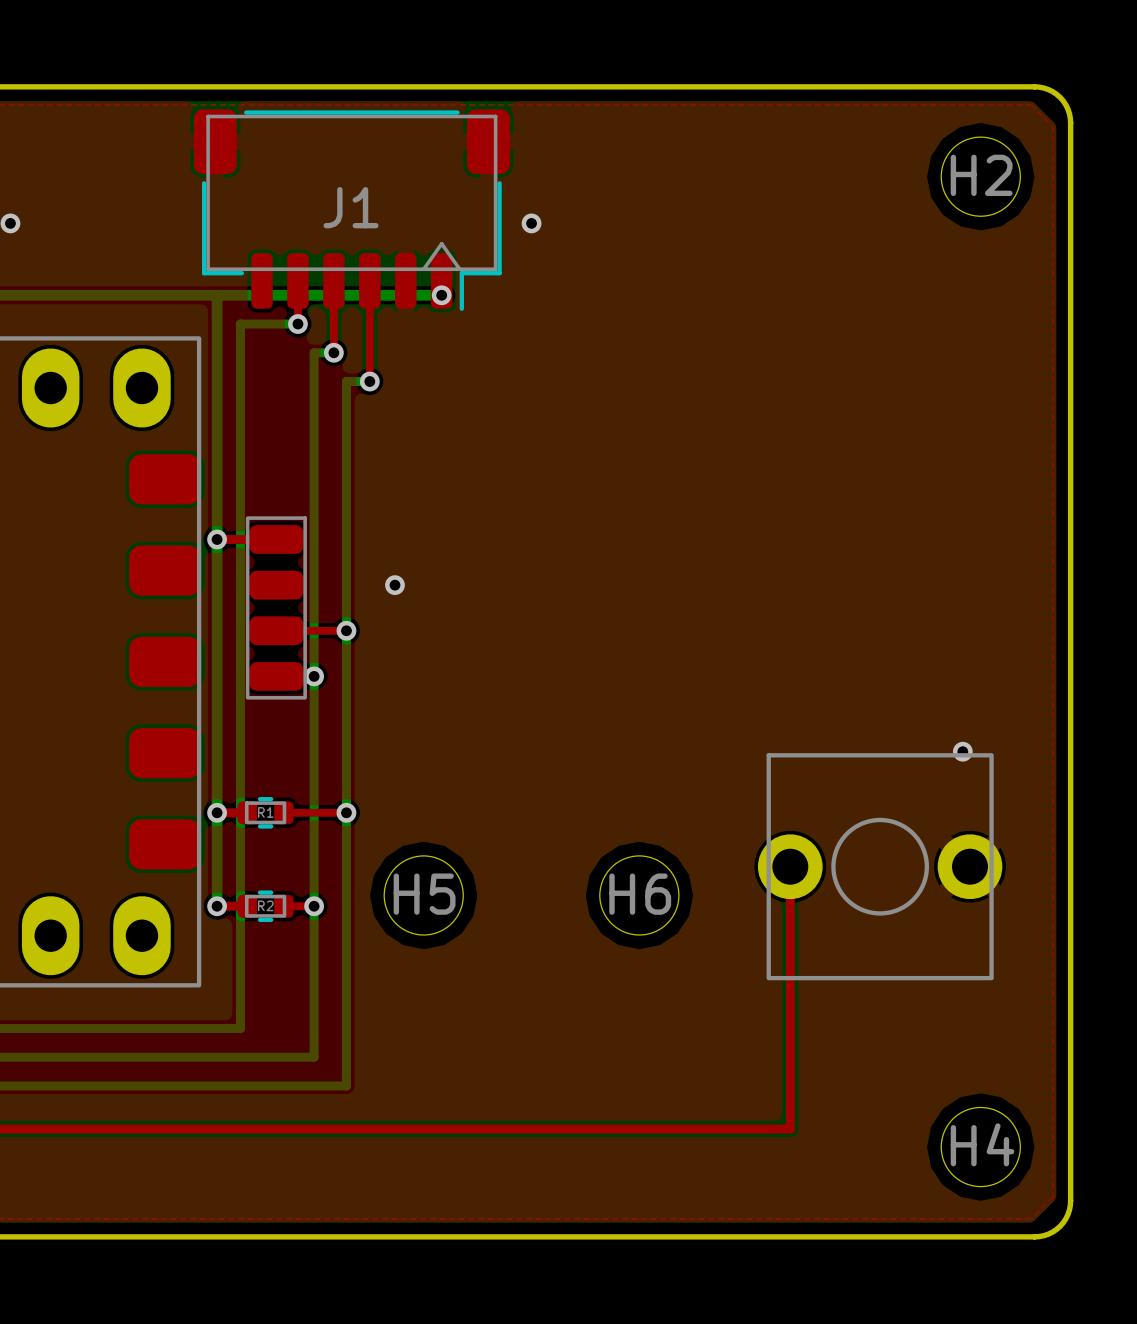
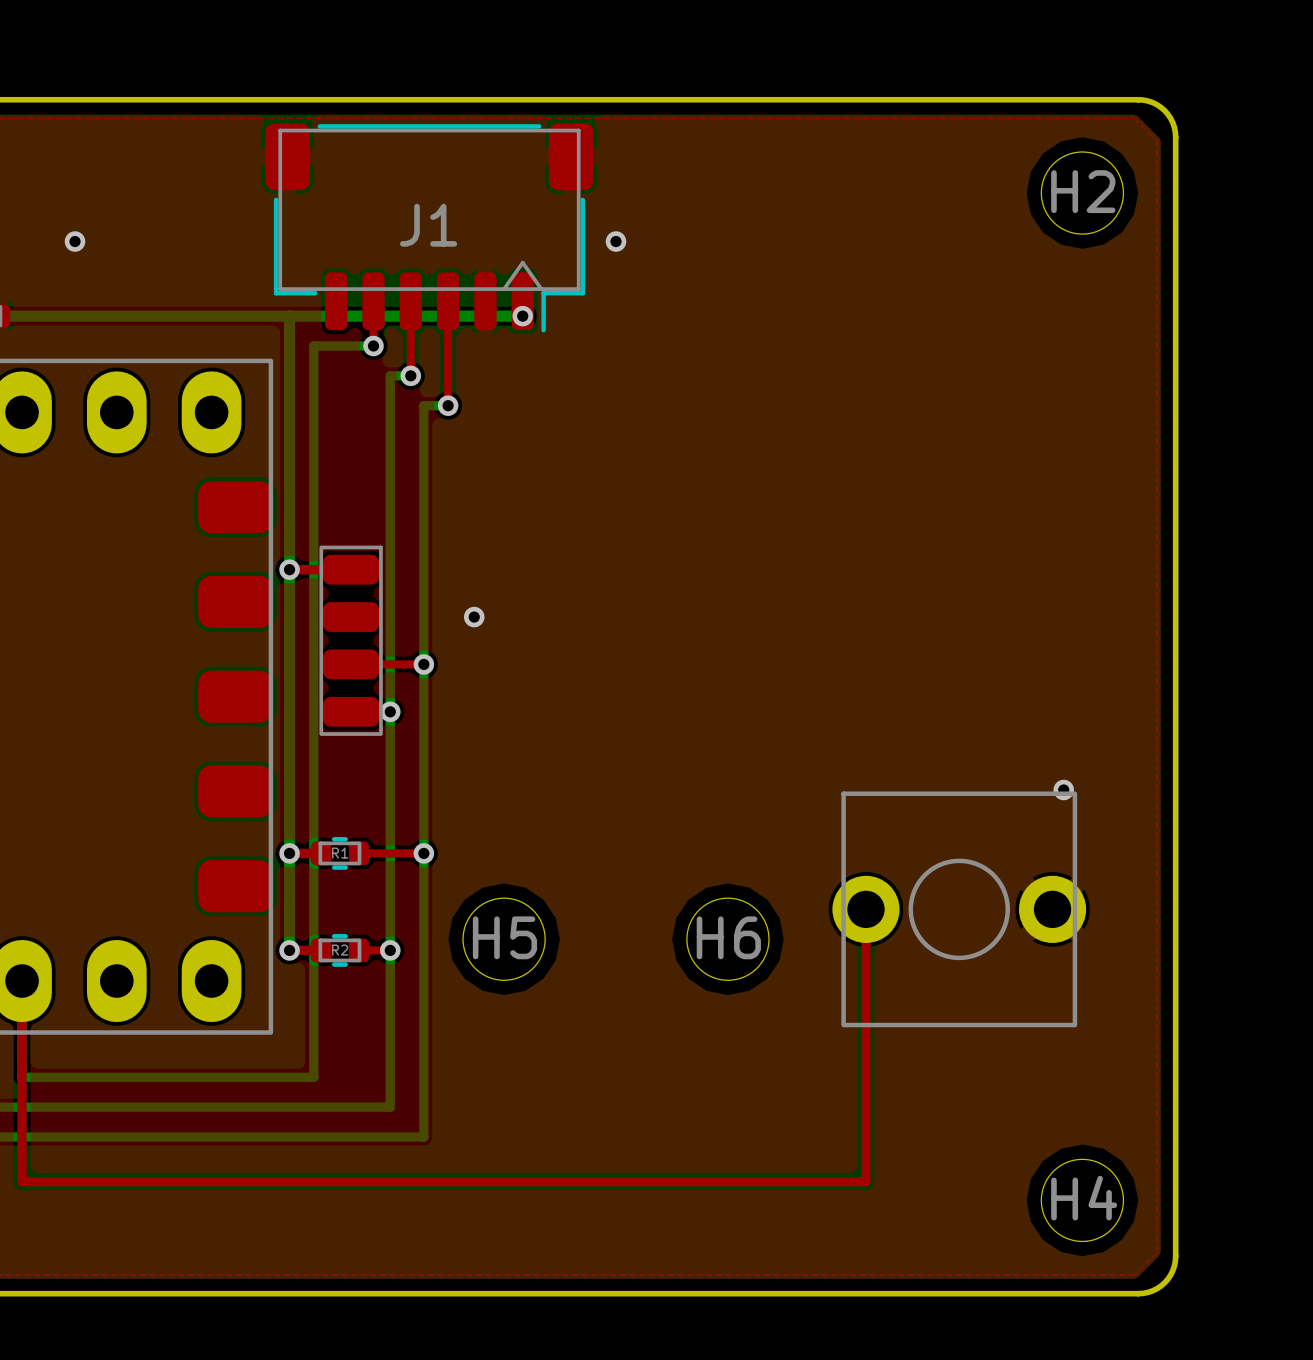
top track: (790, 866) (790, 1129) (772, 1129) -> (865, 909) (865, 1181)
part position: (880, 866) -> (959, 909)

